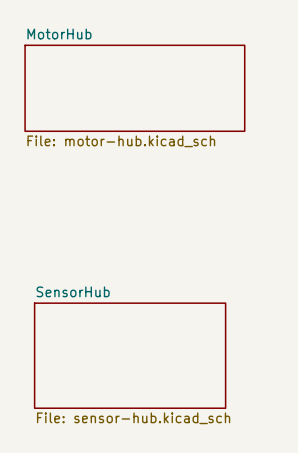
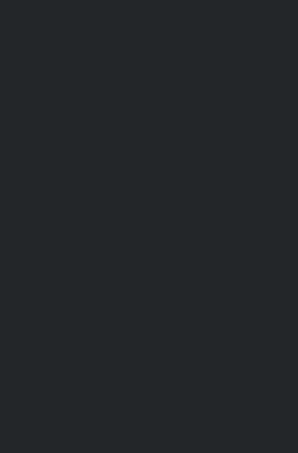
sheet MotorHub: File: motor-hub.kicad_sch (134, 88) -> none
sheet SensorHub: File: sensor-hub.kicad_sch (130, 355) -> none

